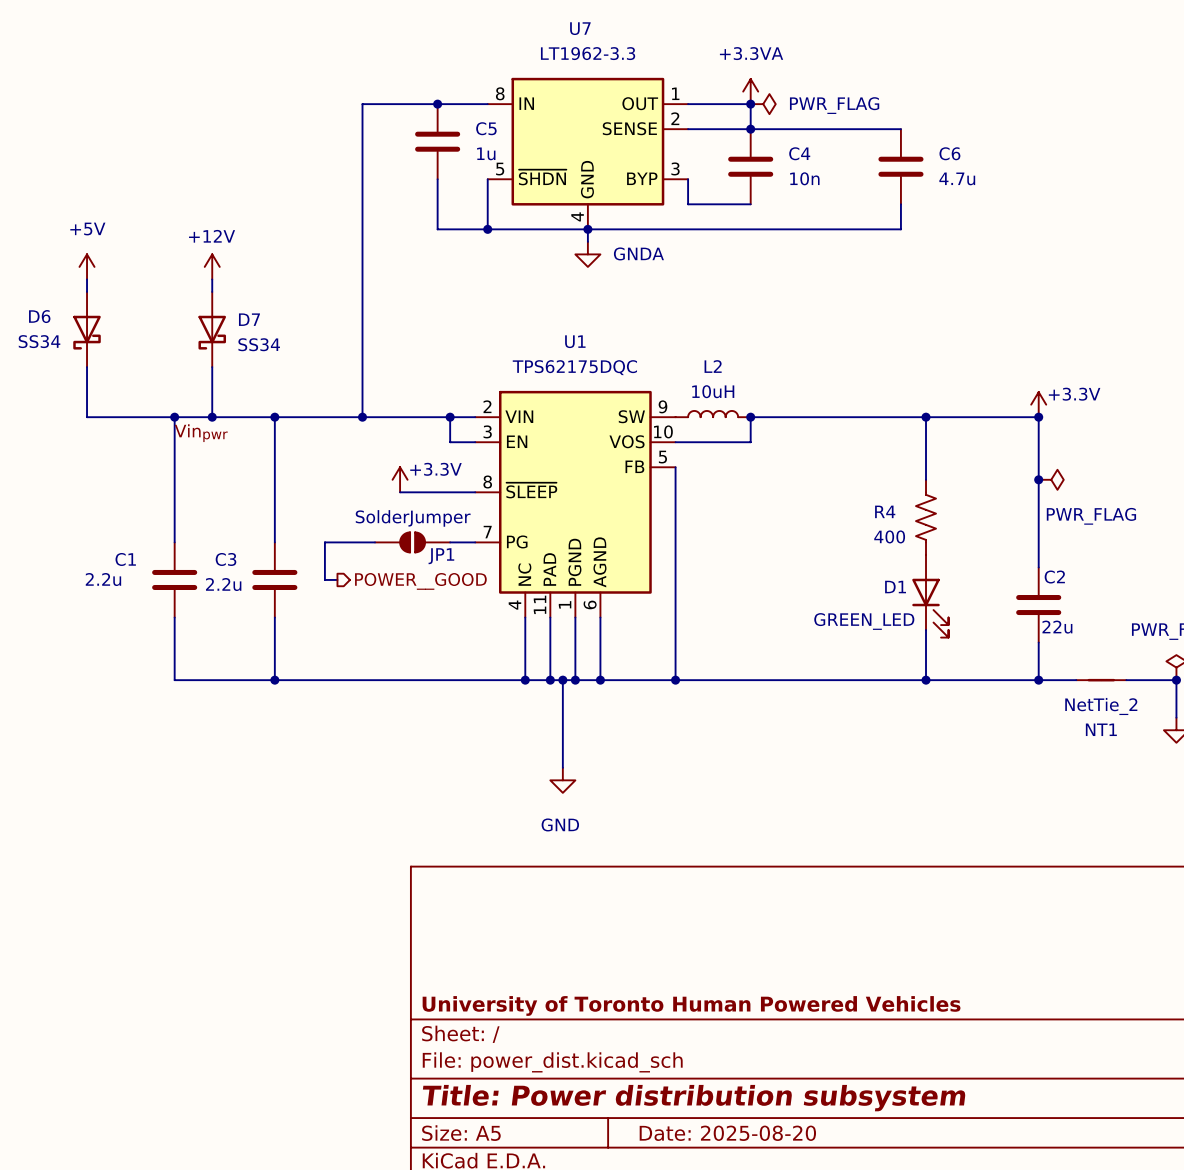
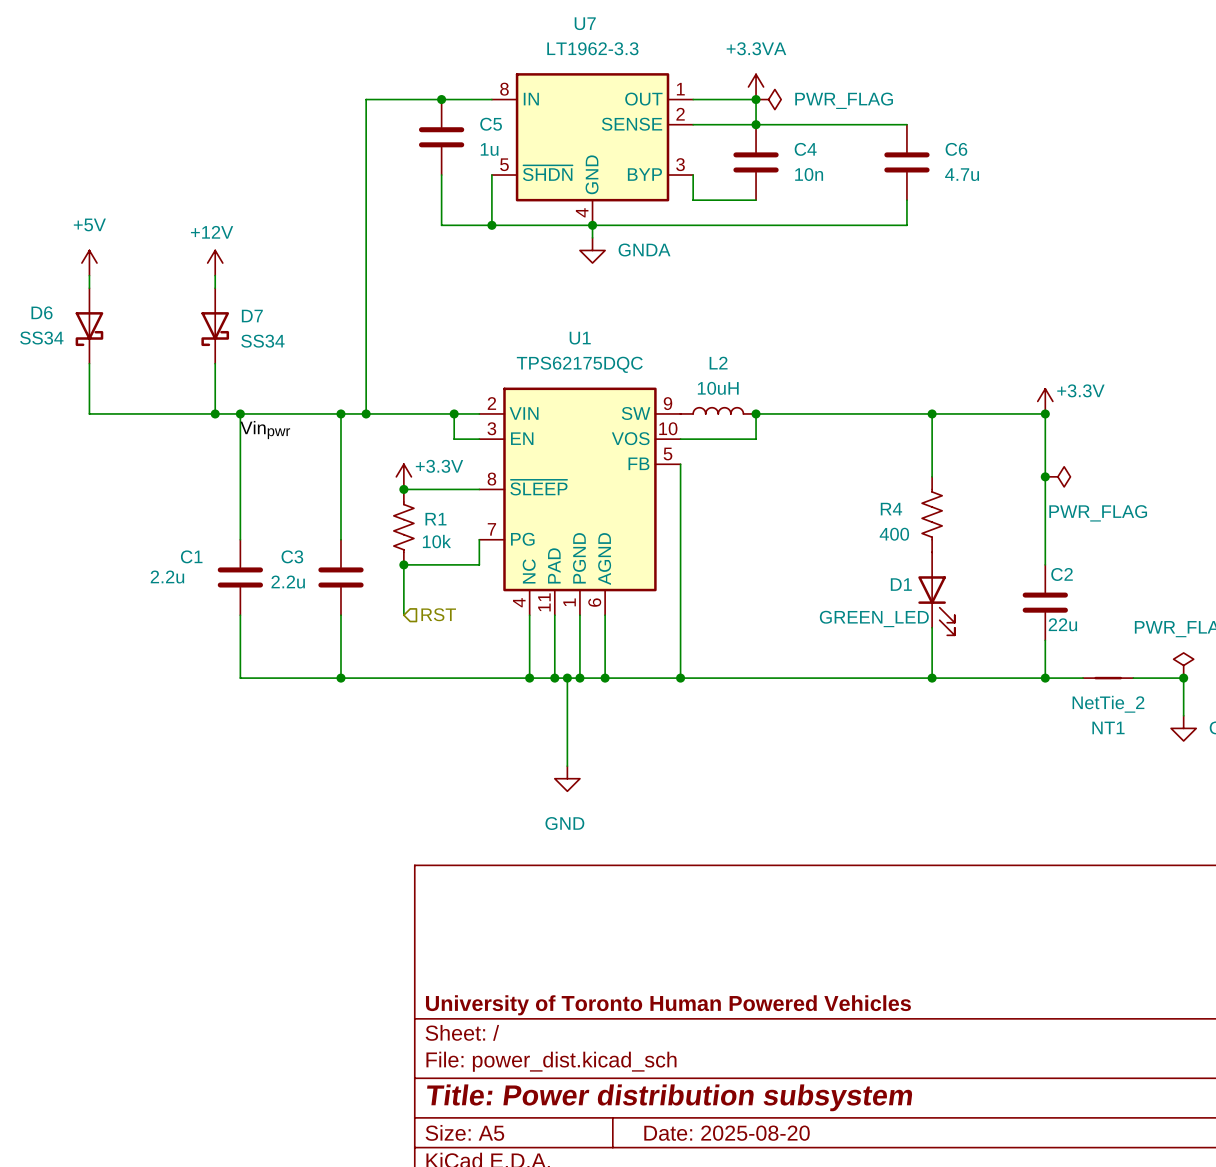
wire: (174, 417) (174, 542) -> (240, 413) (240, 539)
junction: (174, 417) -> none
junction: none -> (240, 413)
wire: (274, 417) (274, 542) -> (340, 413) (340, 539)
junction: (274, 417) -> none
junction: none -> (340, 413)
label position: Vinpwr (201, 433) -> Vinpwr (265, 430)
junction: none -> (403, 489)
R1: none -> 10k (403, 527)
wire: (375, 542) (324, 542) (324, 579) (337, 579) -> none
JP1: SolderJumper (412, 542) -> none
wire: (450, 542) (475, 542) -> (403, 615) (403, 564) (479, 564) (479, 539)
junction: none -> (403, 564)
C1 position: (174, 579) -> (240, 577)
C3 position: (274, 579) -> (340, 577)
hierarchical label: POWER__GOOD (420, 581) -> none
wire: (174, 617) (174, 680) (237, 680) -> (240, 615) (240, 678)
wire: (274, 617) (274, 680) -> (340, 615) (340, 678)
hierarchical label: none -> RST (438, 614)
junction: (274, 680) -> none
junction: none -> (340, 678)

